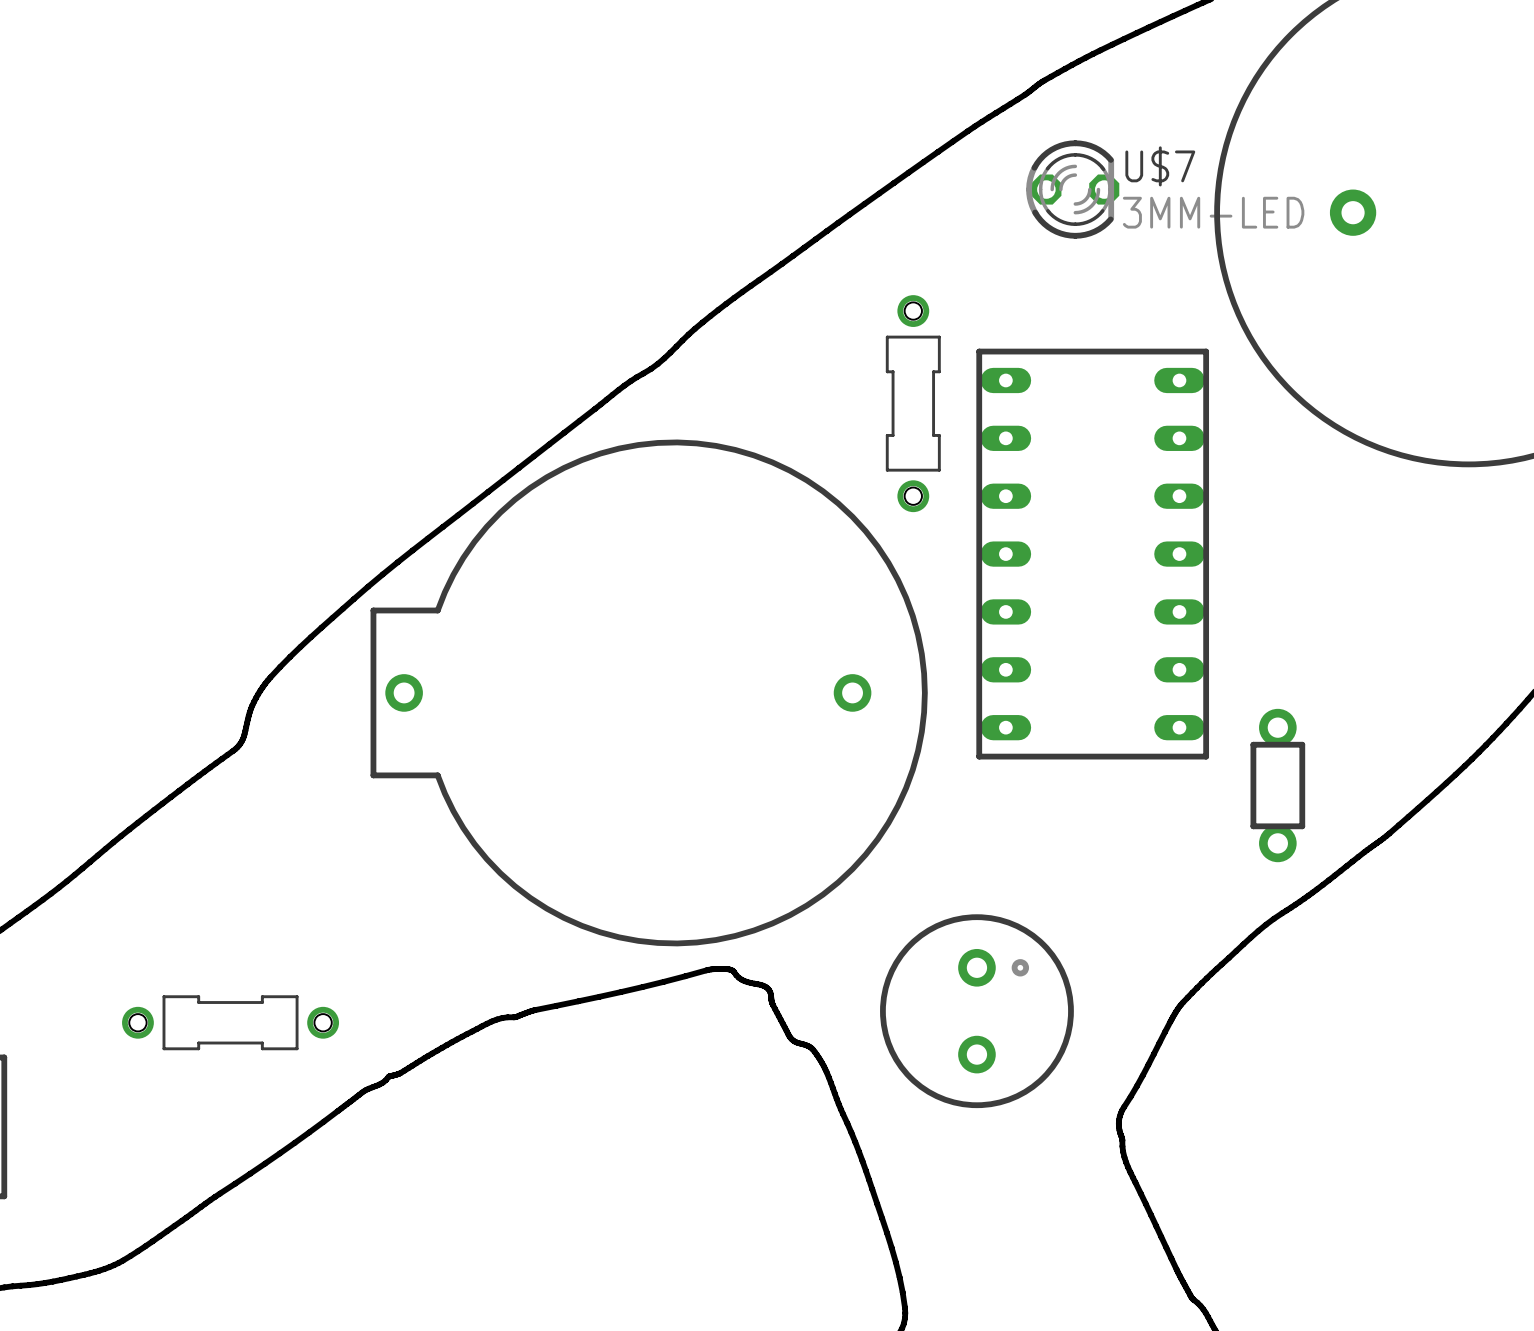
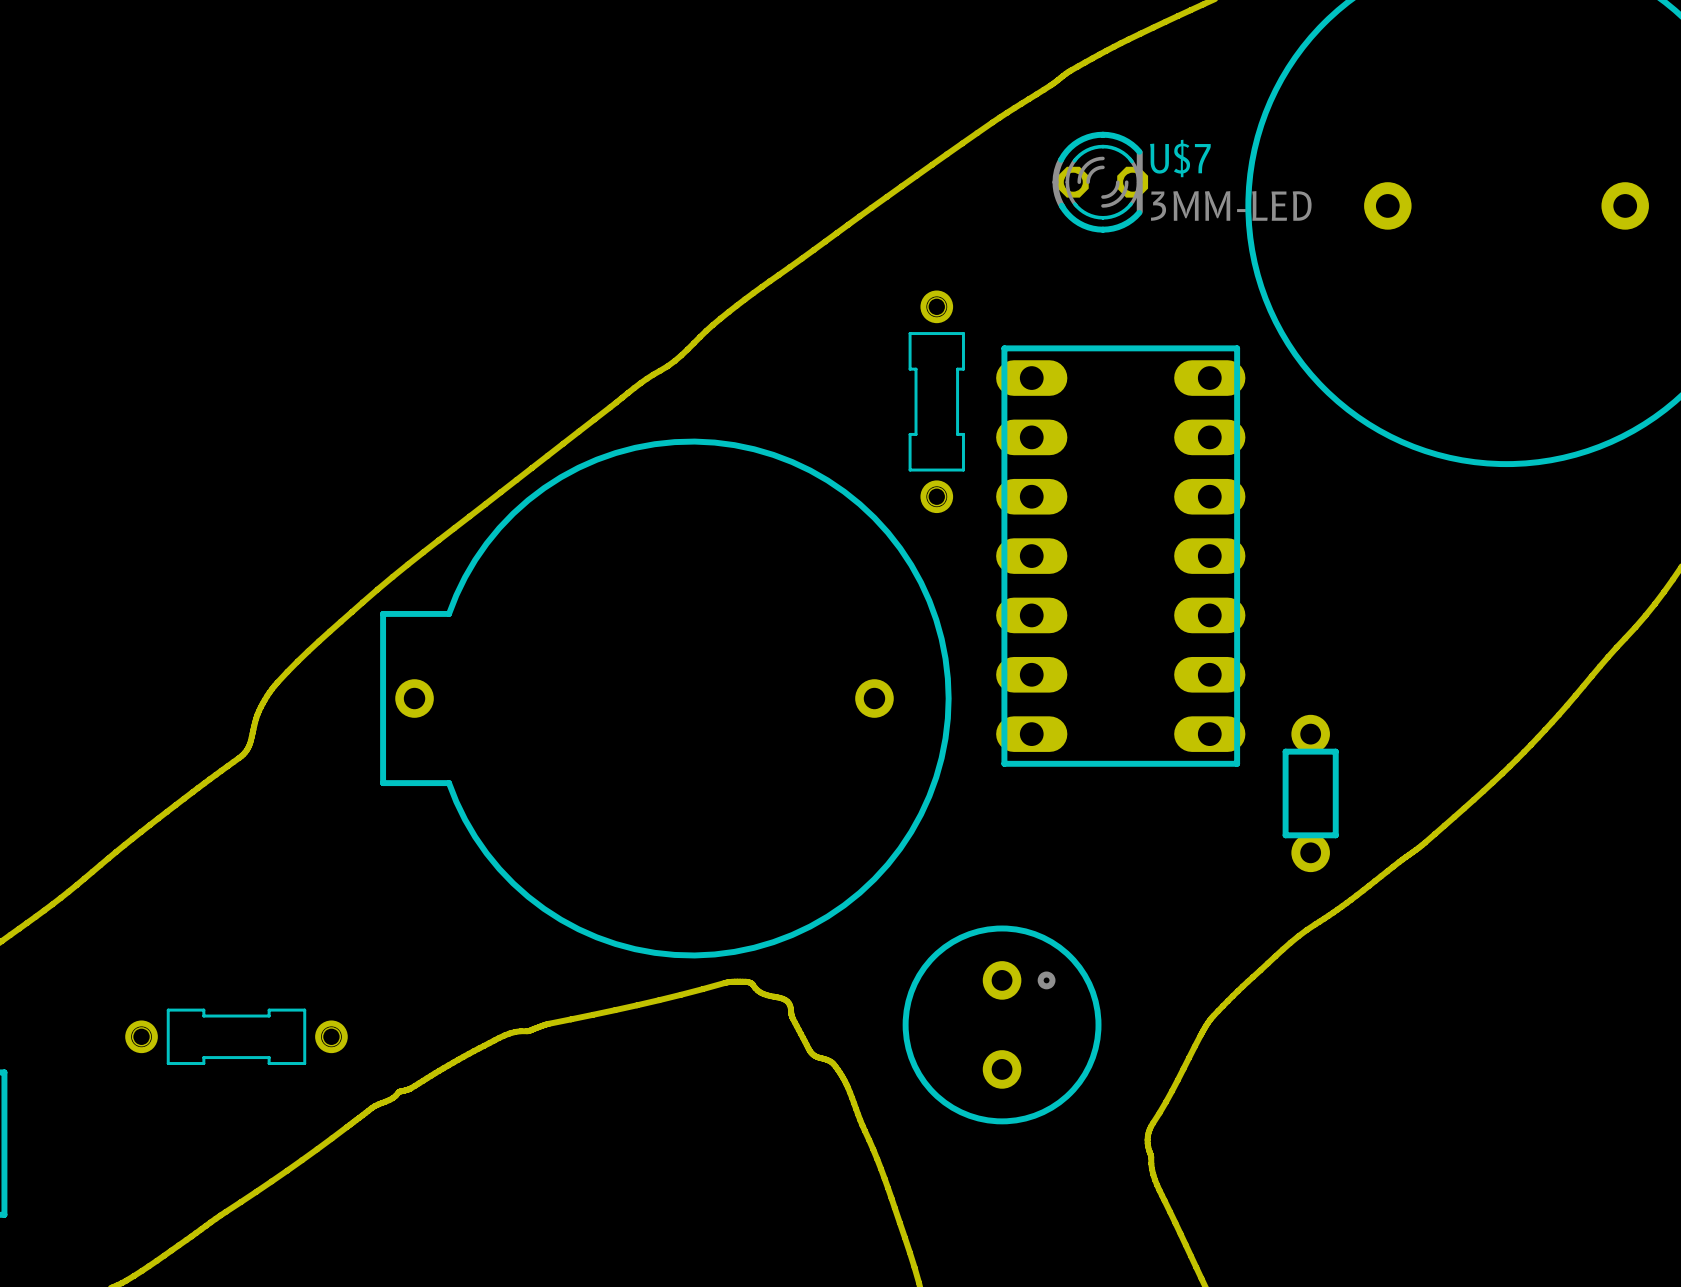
part footprint: [976, 348, 1210, 760] -> [996, 345, 1246, 767]

